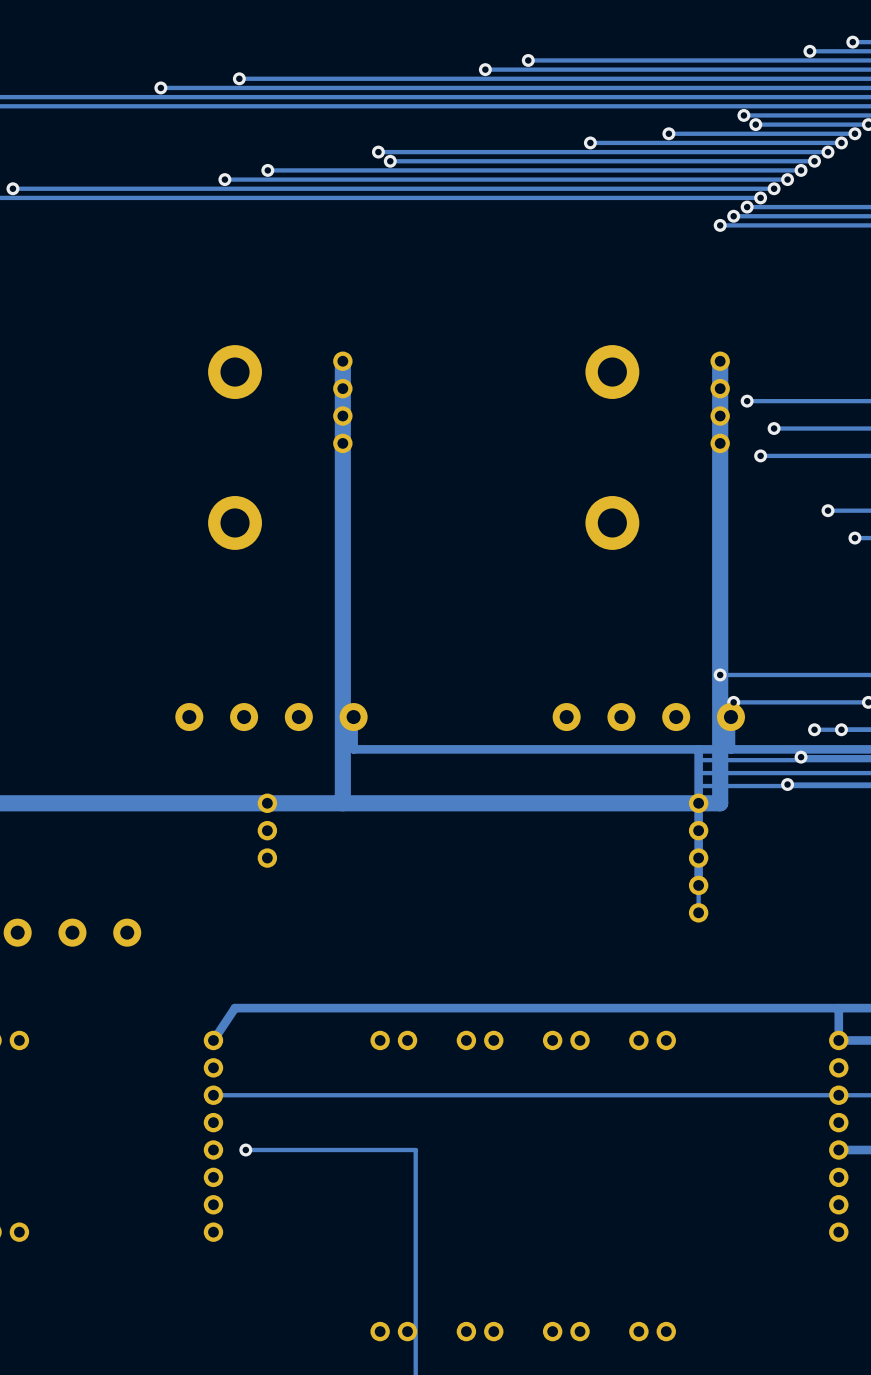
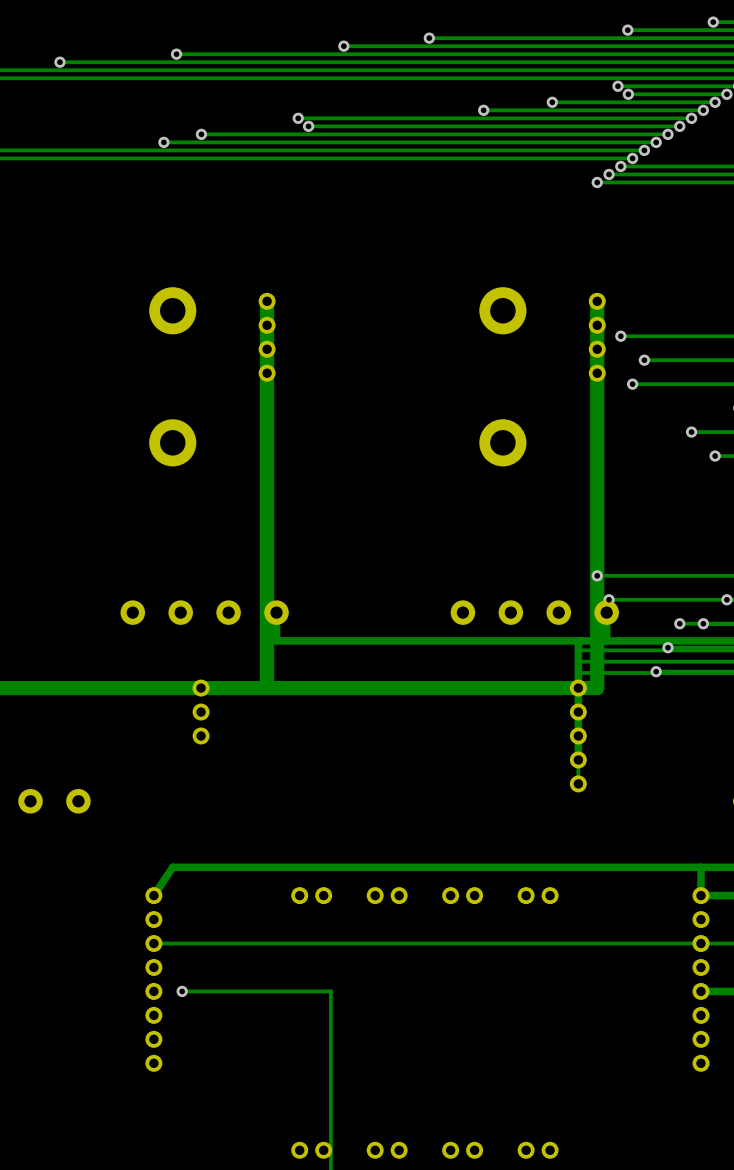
track: none -> (675, 30) (627, 30)
via position: (809, 51) -> (627, 30)
track: none -> (391, 46) (343, 46)
via position: (485, 69) -> (343, 46)
track: none -> (107, 62) (59, 62)
via position: (160, 87) -> (59, 62)

